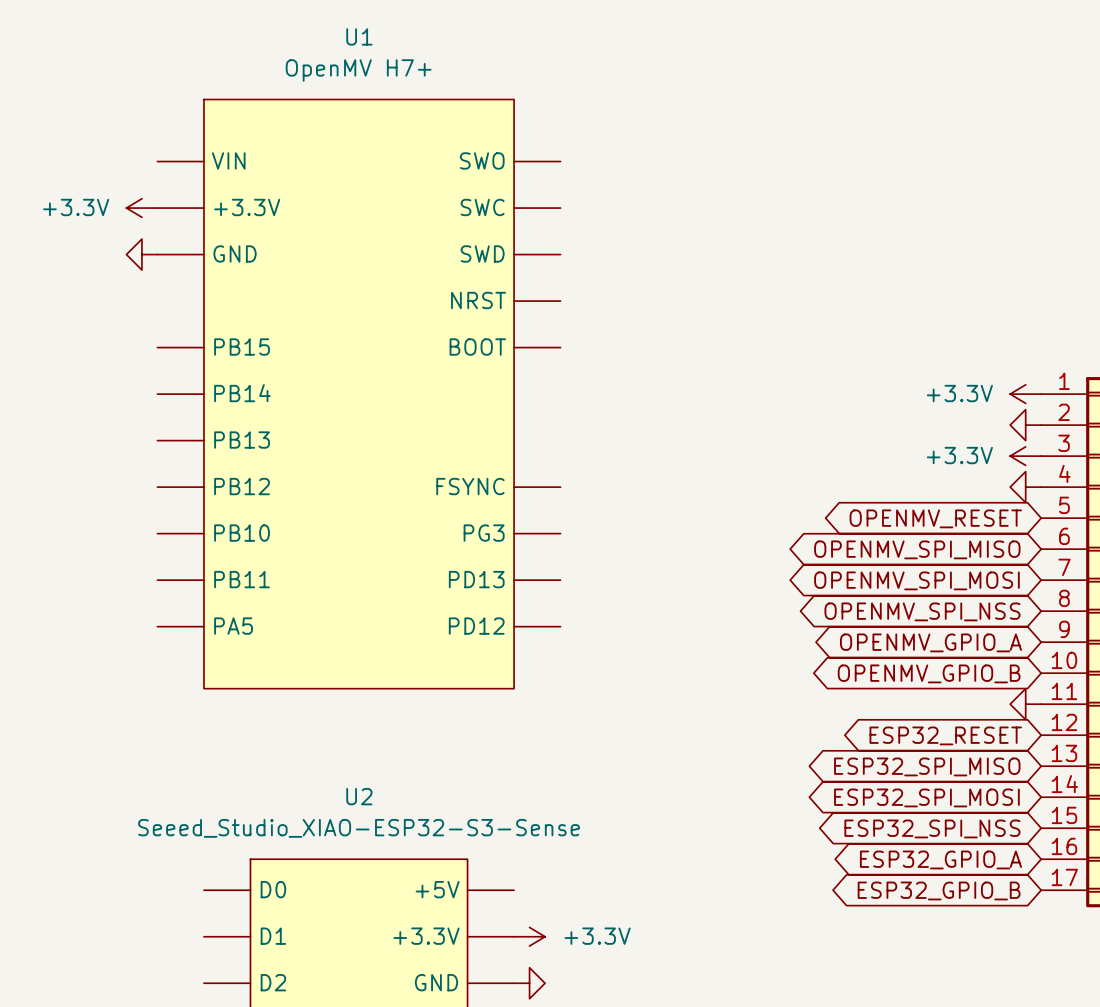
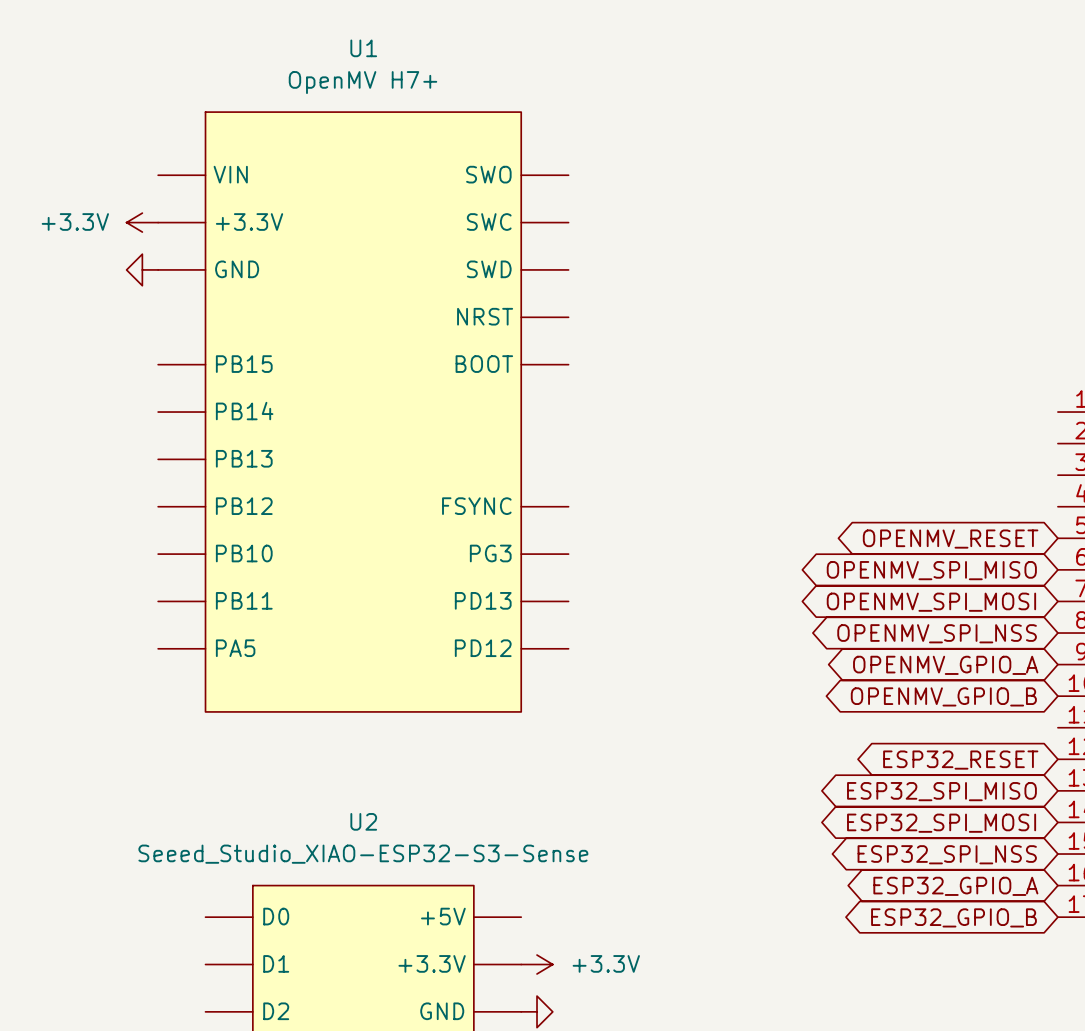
power symbol: +3.3V (1025, 394) -> none
power symbol: (1025, 425) -> none
power symbol: +3.3V (1025, 456) -> none
power symbol: (1025, 487) -> none
power symbol: (1025, 704) -> none

